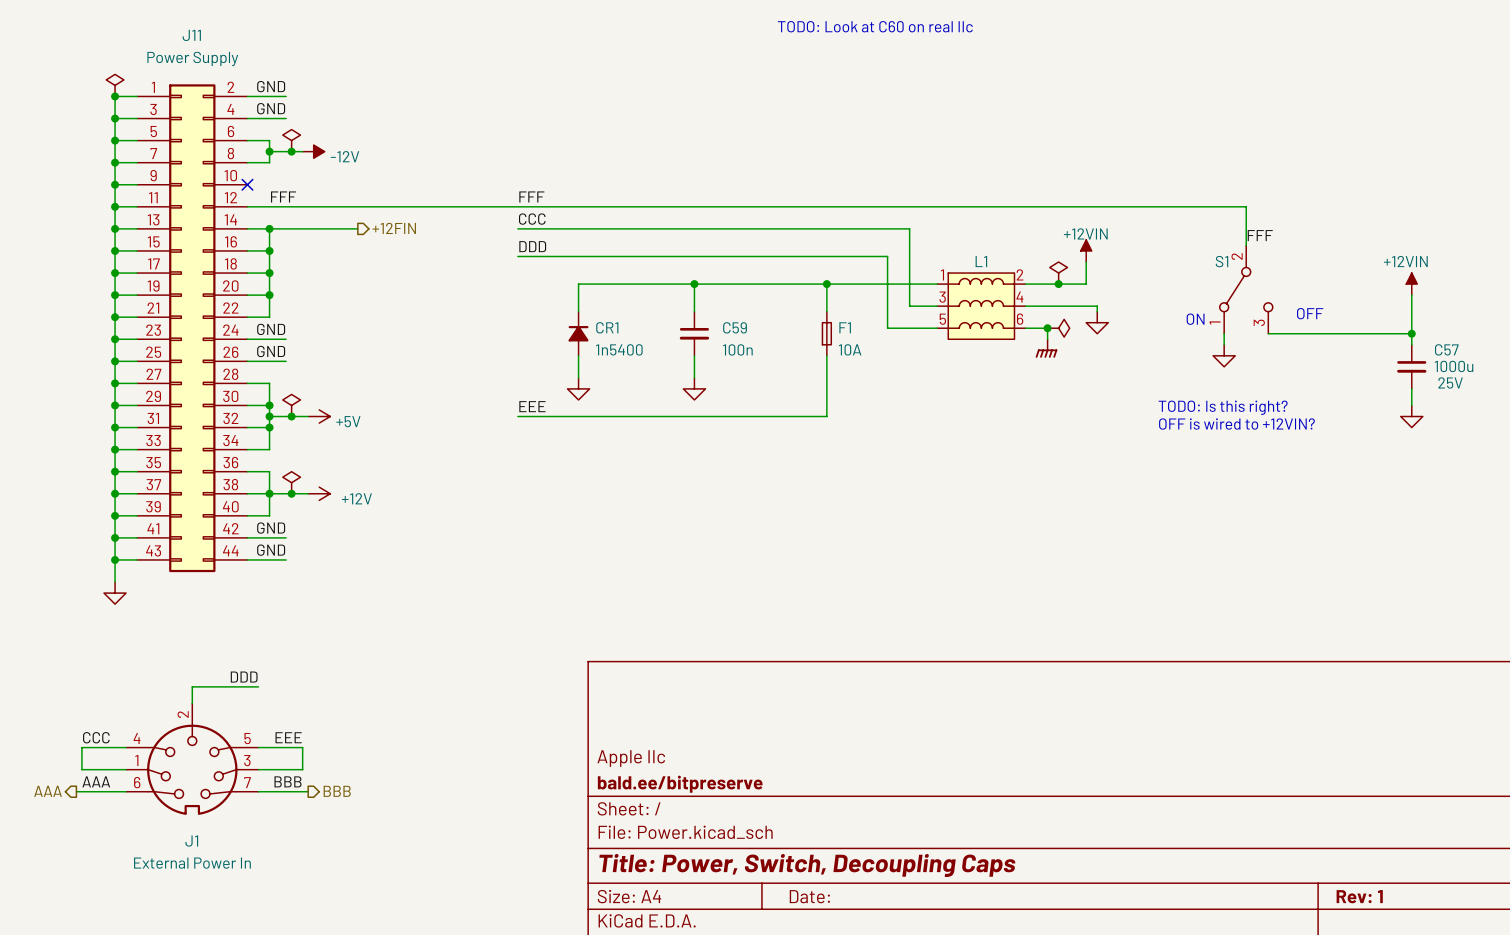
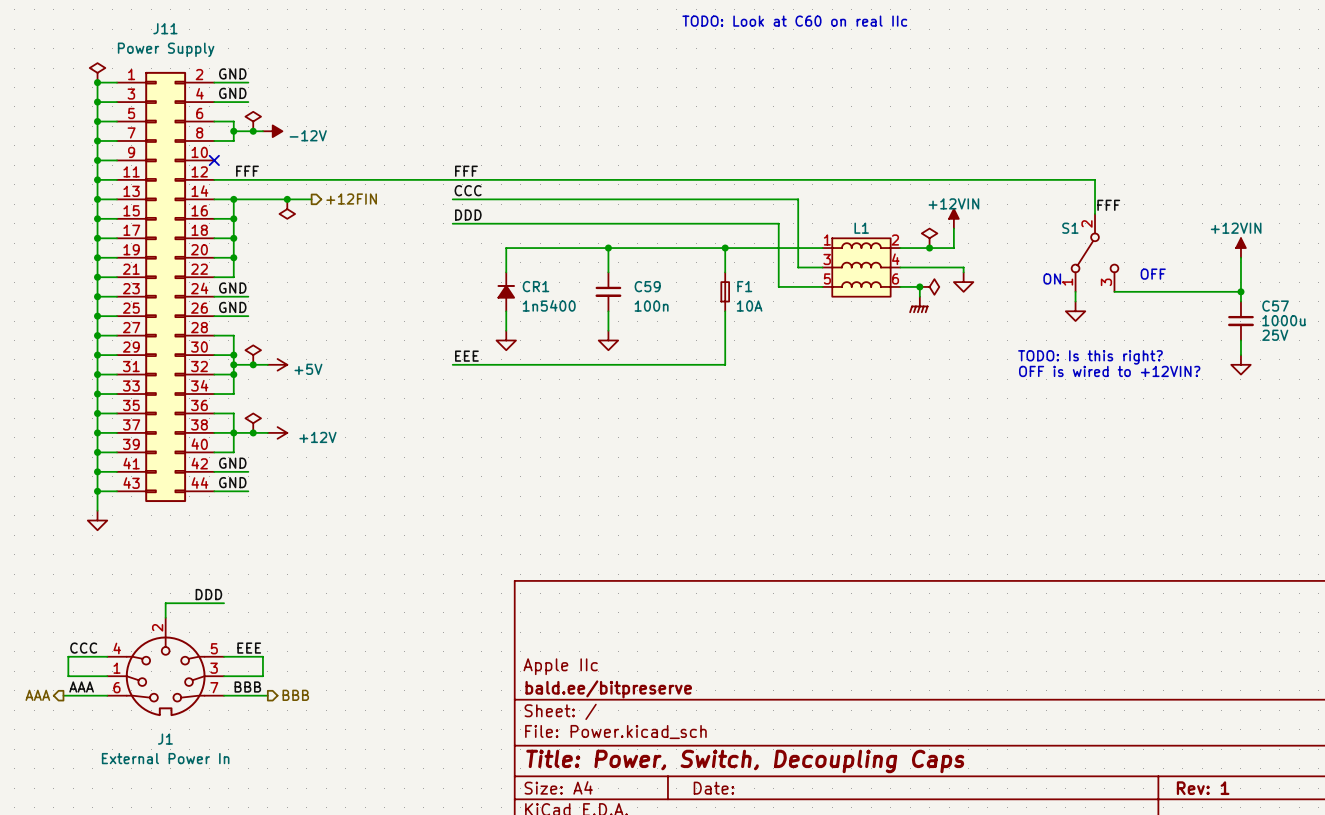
junction: none -> (287, 199)
power symbol: none -> (287, 209)

